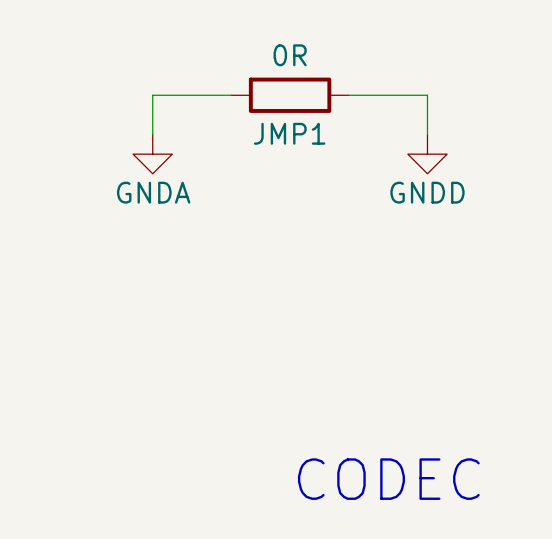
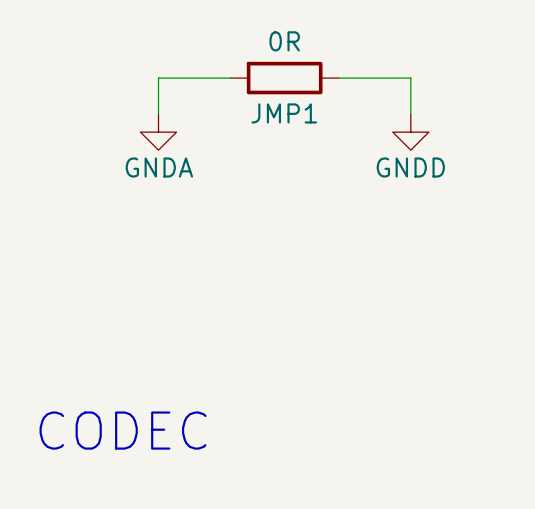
text position: CODEC (388, 479) -> CODEC (123, 430)

